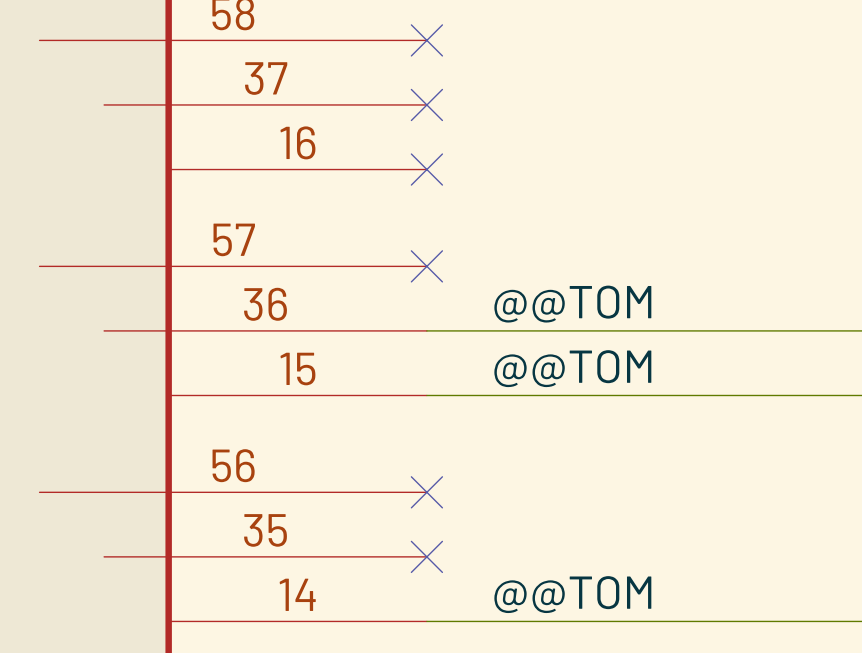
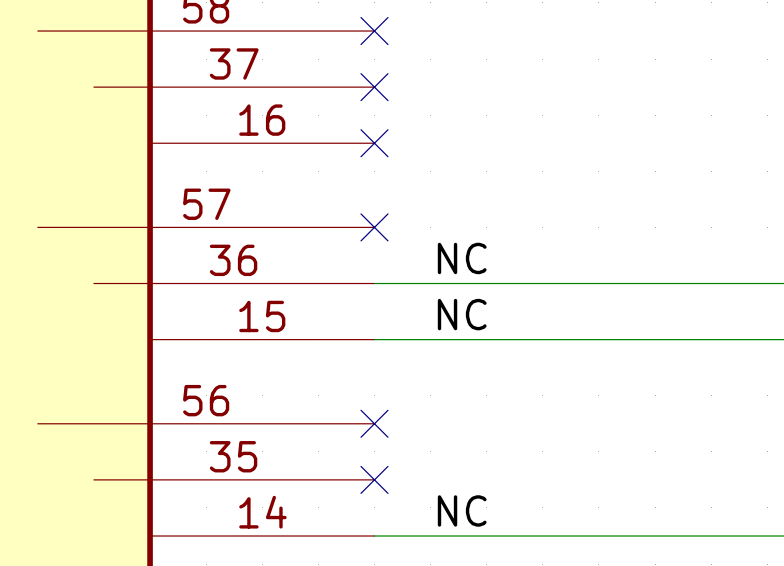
label: @@TOM (572, 304) -> NC (462, 258)
label: @@TOM (572, 368) -> NC (462, 314)
label: @@TOM (572, 594) -> NC (462, 510)

